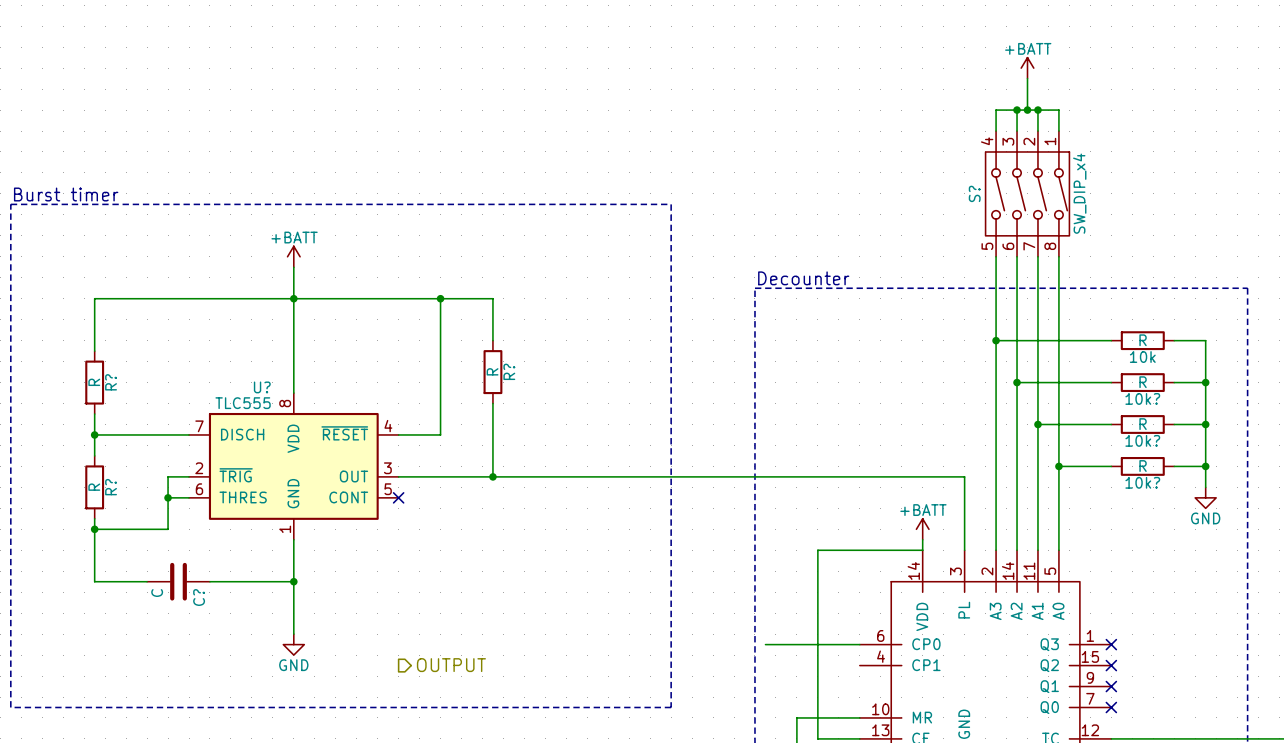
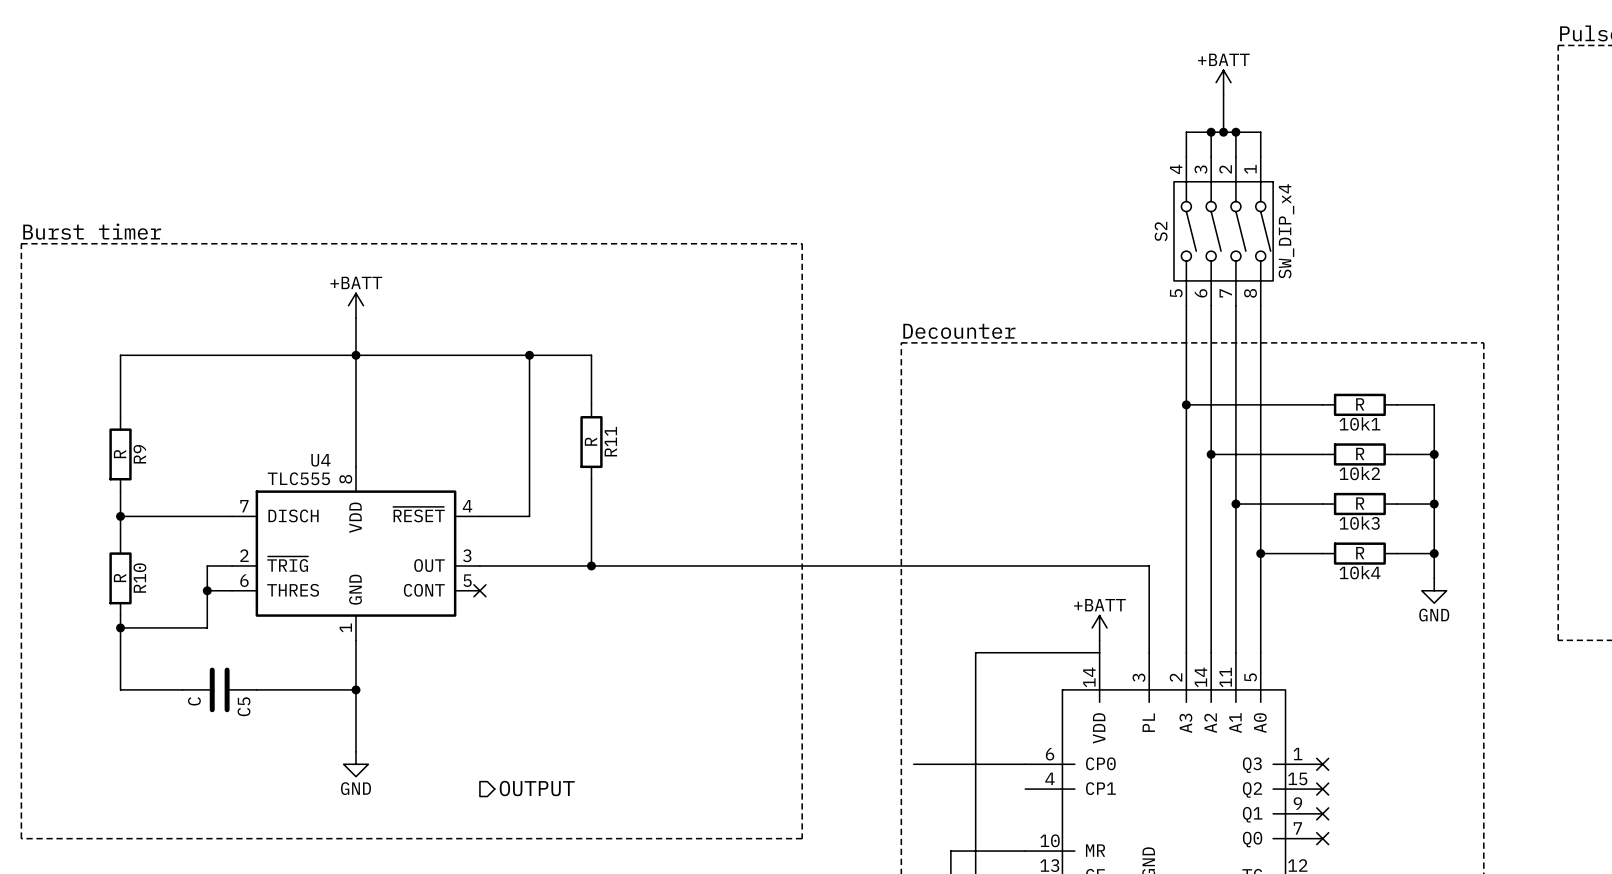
S? name: S? (974, 193) -> S2 (1161, 231)
10k name: 10k (1142, 357) -> 10k1 (1359, 423)
R? name: R? (509, 371) -> R11 (610, 441)
R? name: R? (111, 382) -> R9 (139, 454)
U? name: U? (262, 387) -> U4 (320, 460)
10k? name: 10k? (1142, 398) -> 10k2 (1359, 473)
10k? name: 10k? (1142, 440) -> 10k3 (1359, 523)
10k? name: 10k? (1142, 482) -> 10k4 (1360, 572)
R? name: R? (111, 487) -> R10 (139, 578)
C? name: C? (199, 597) -> C5 (244, 706)

